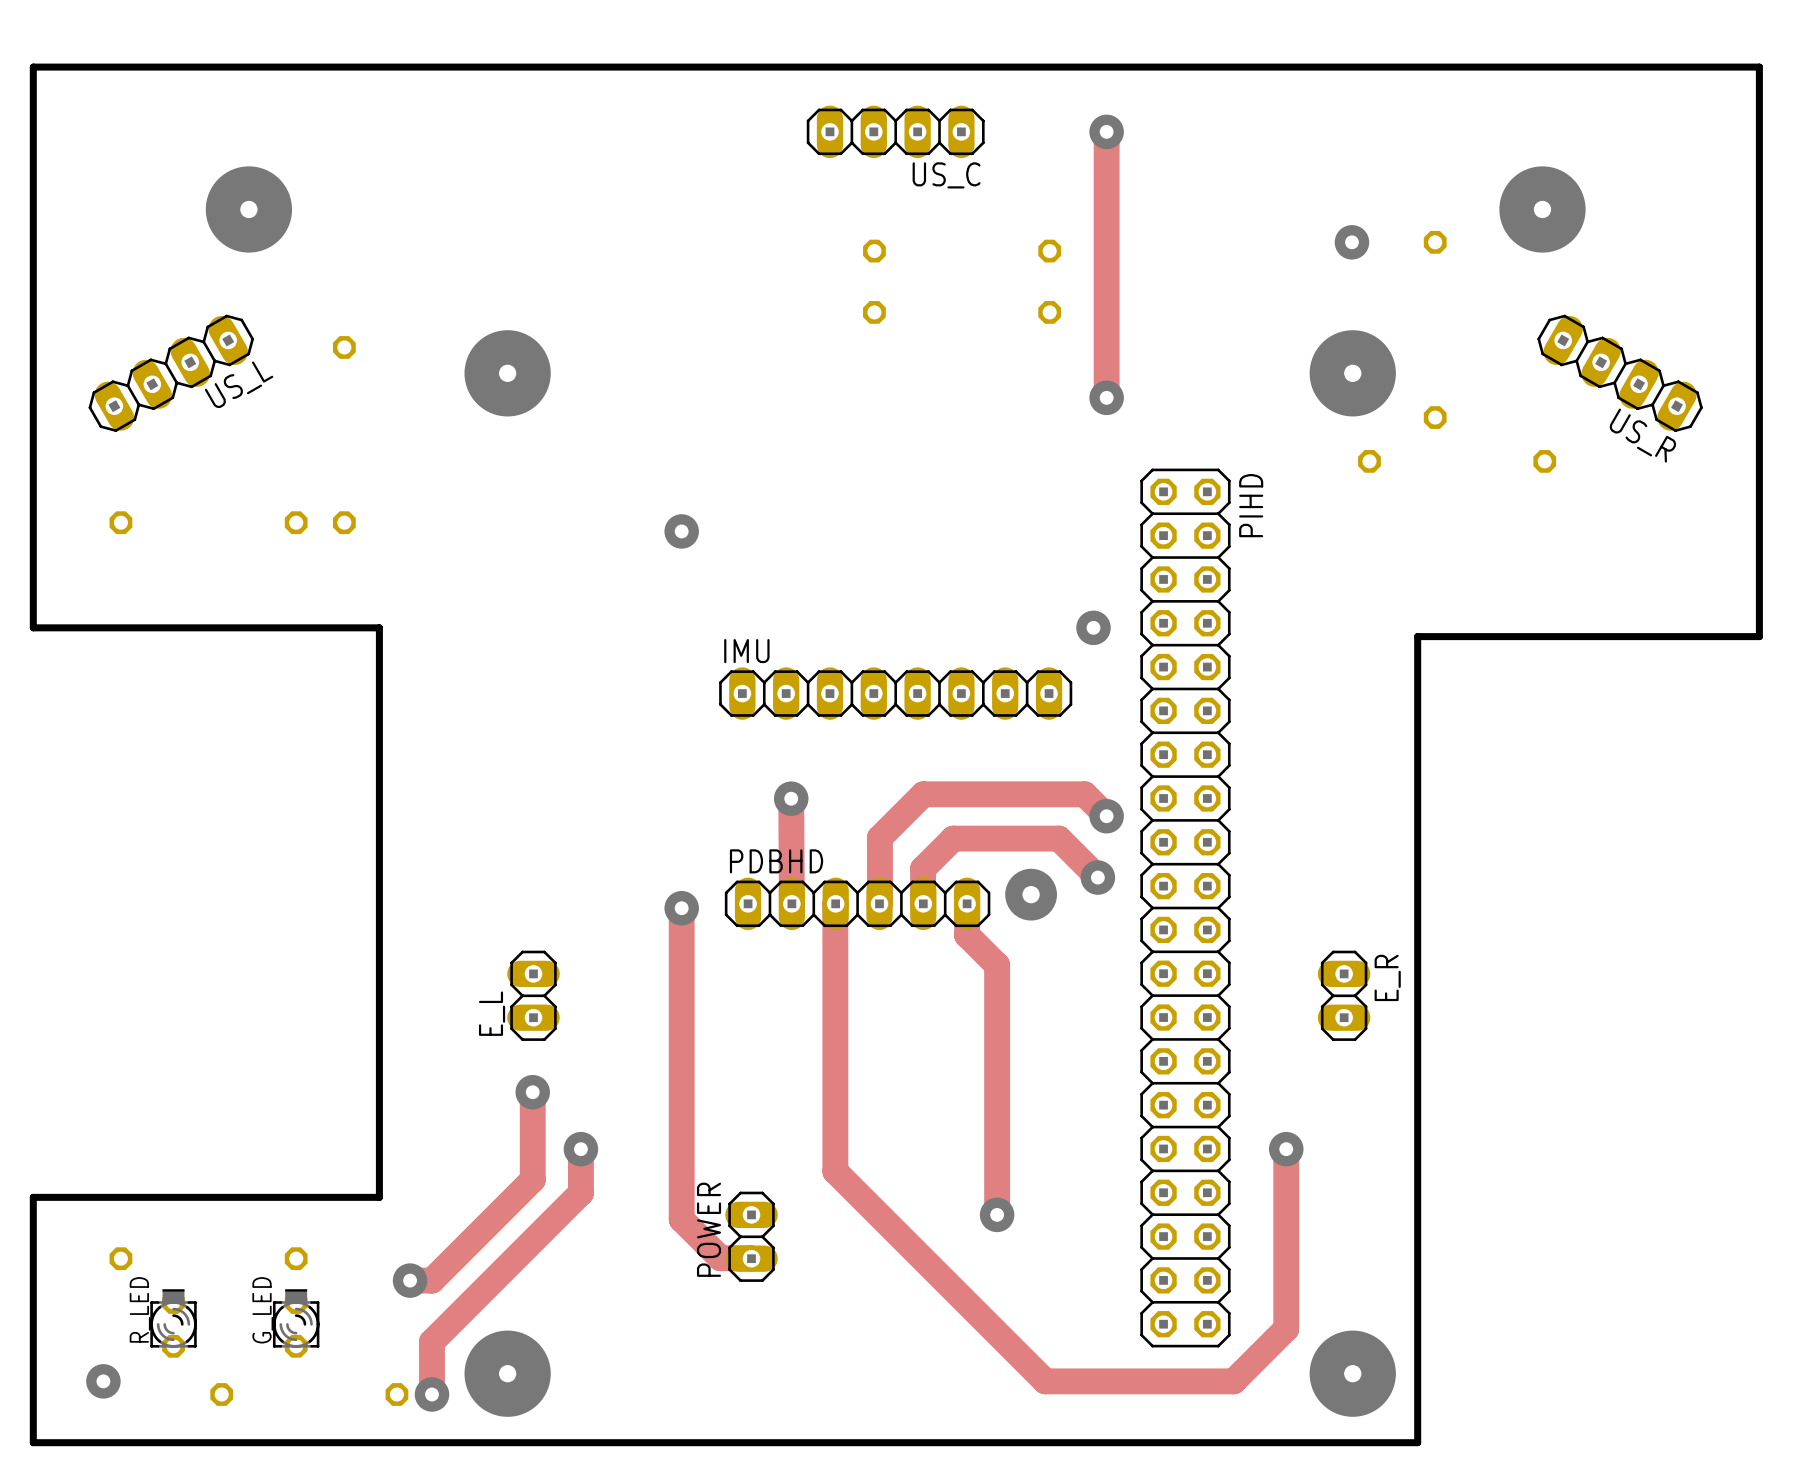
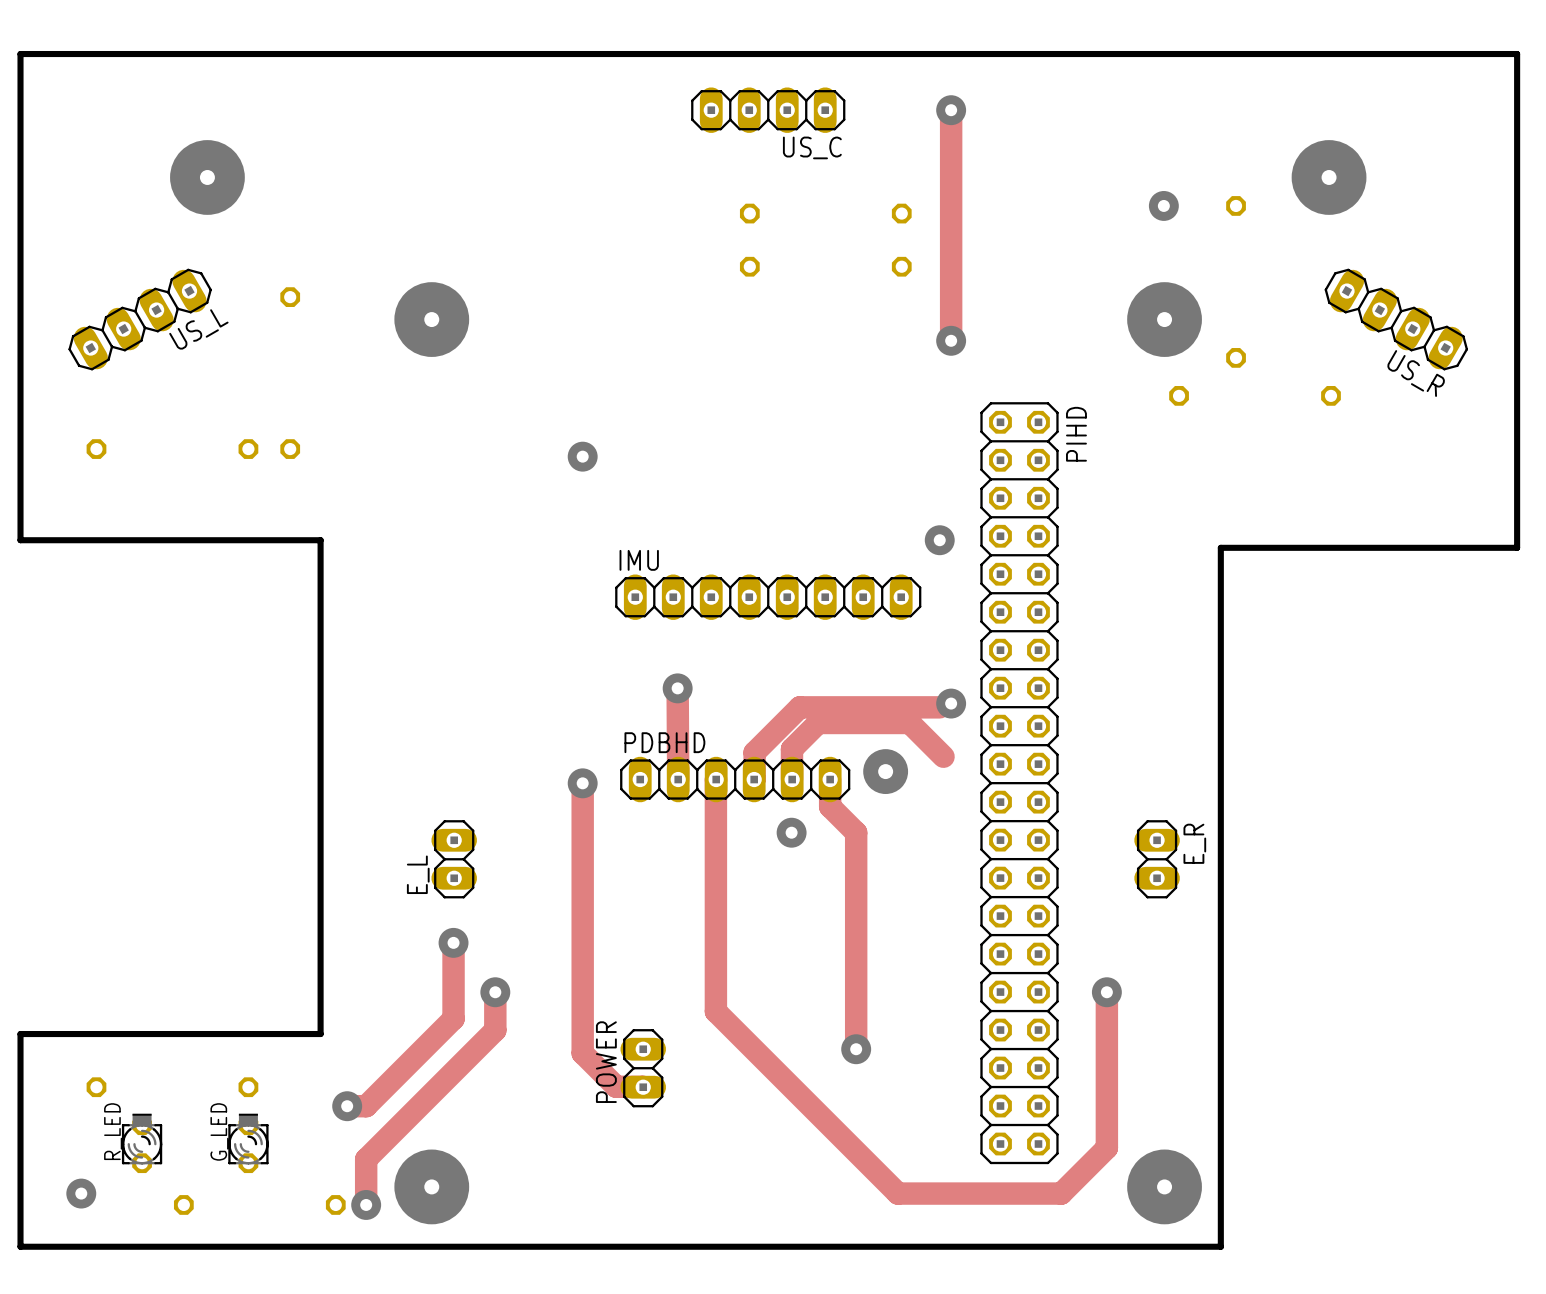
track: (1106, 816) (1084, 794) (923, 794) (879, 837) (879, 872) -> (939, 707) (799, 707) (754, 752)
via: (1097, 877) -> none
via: none -> (791, 832)

